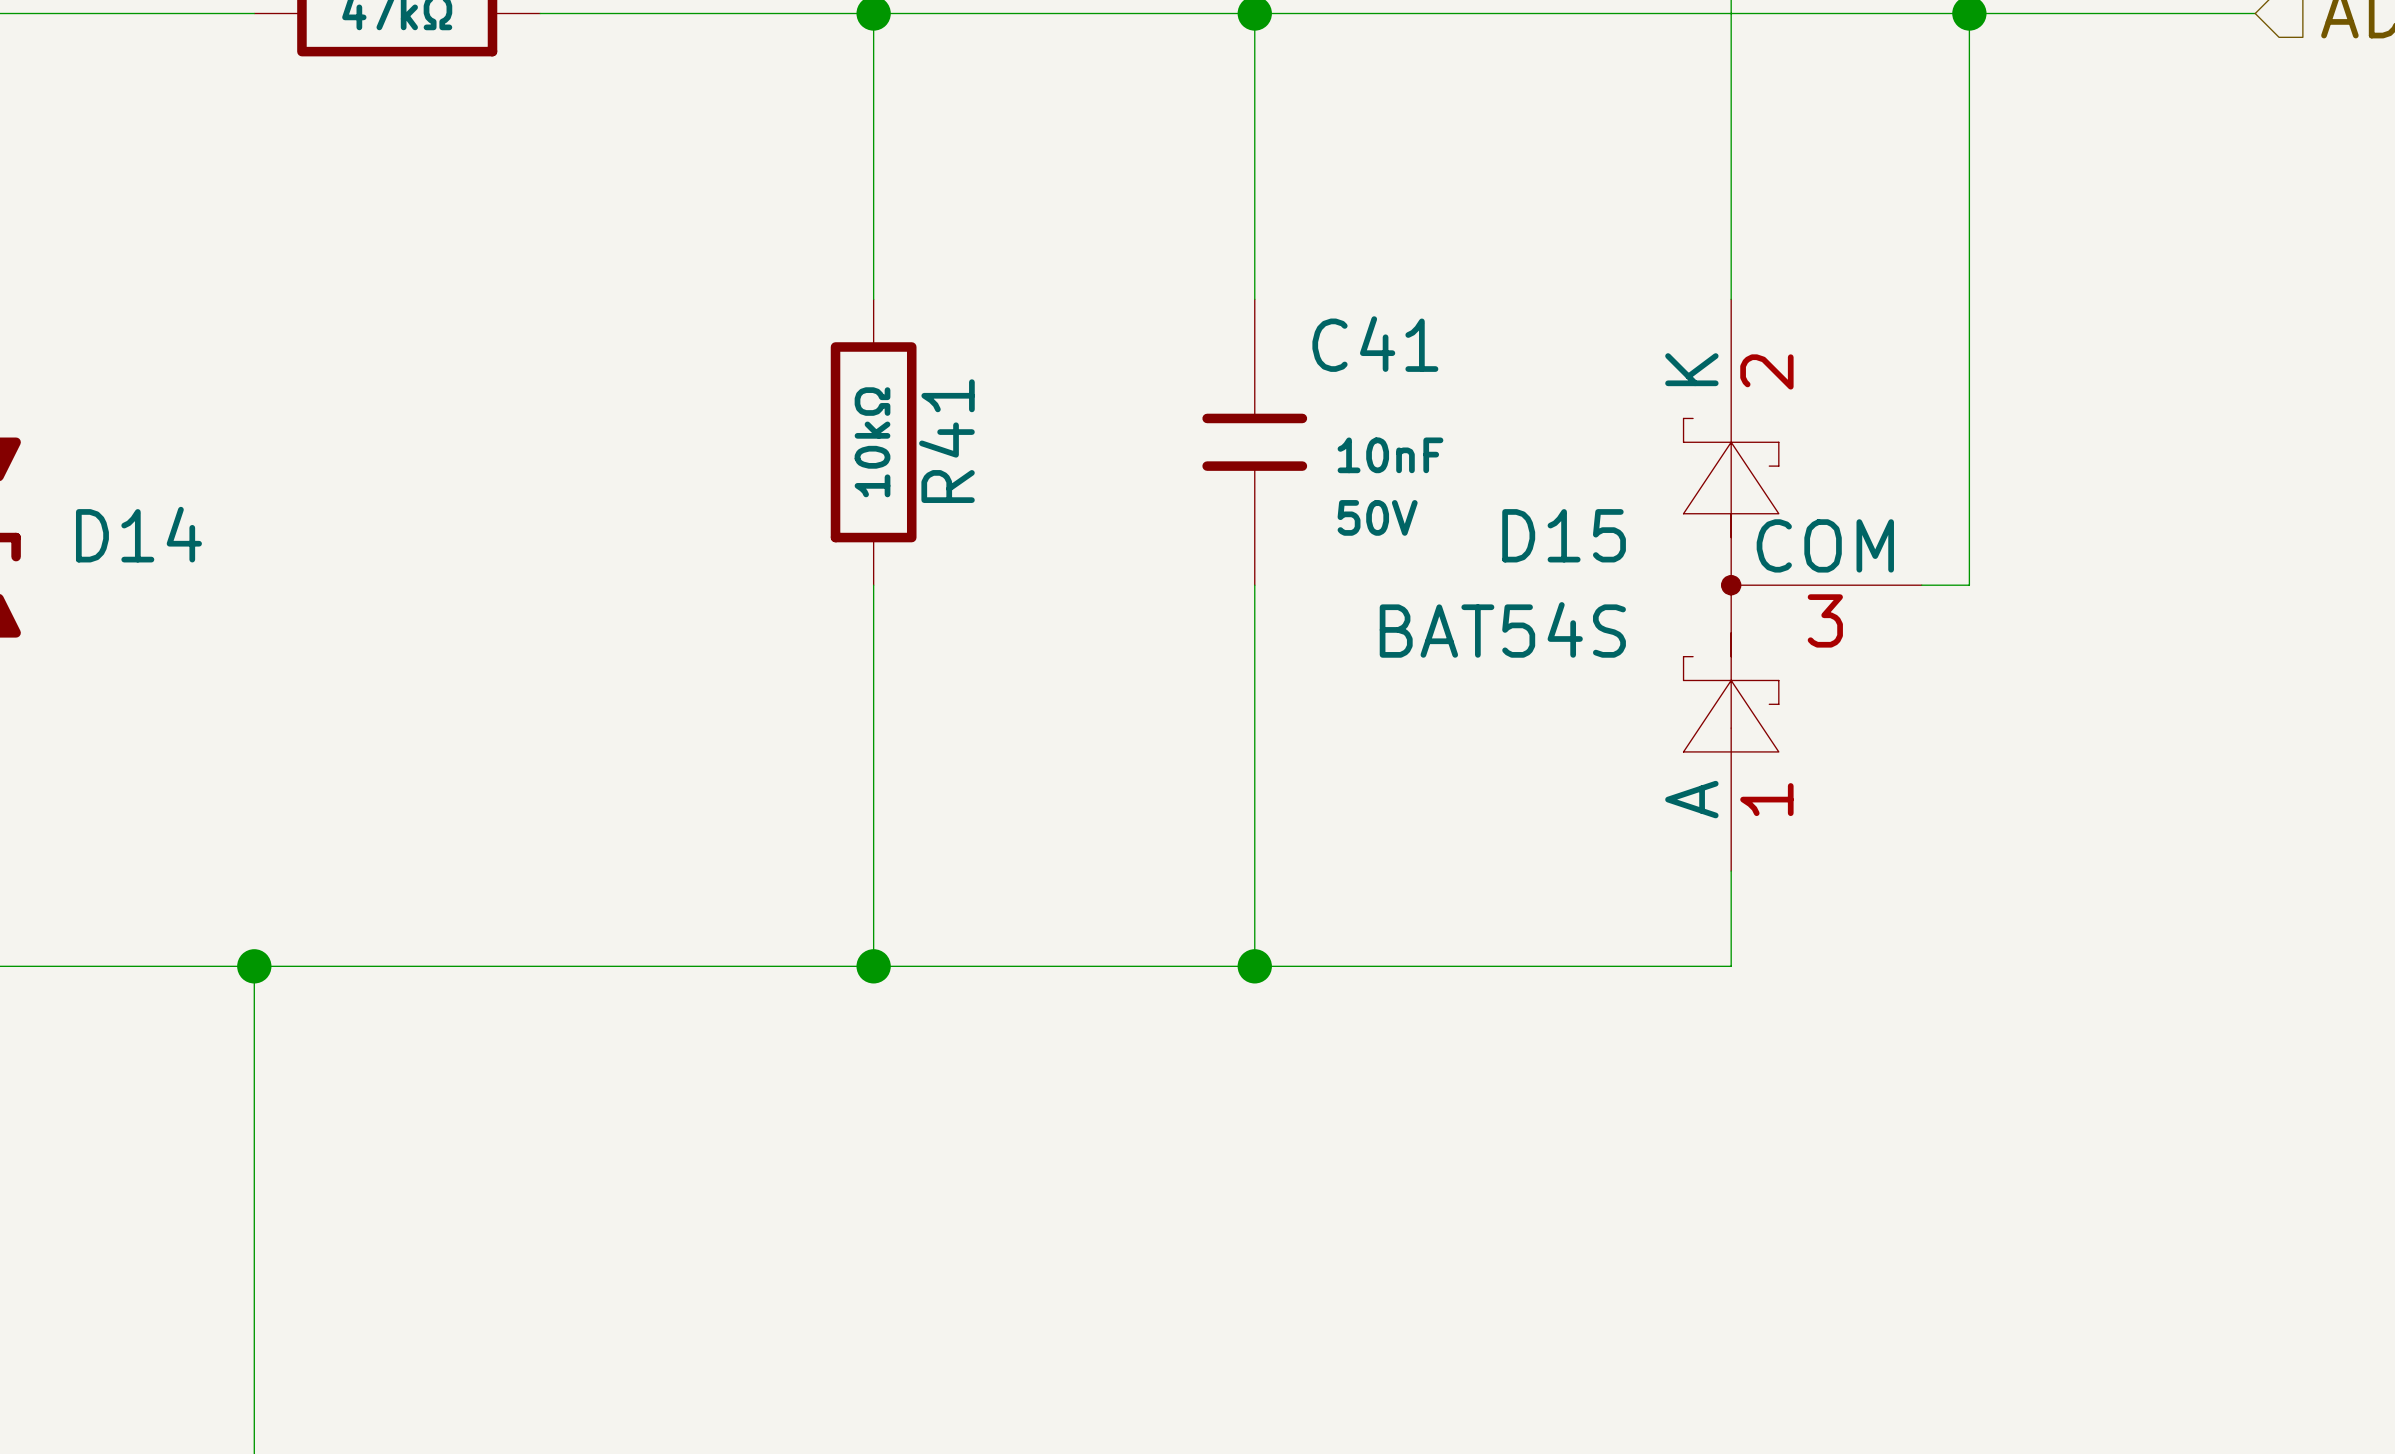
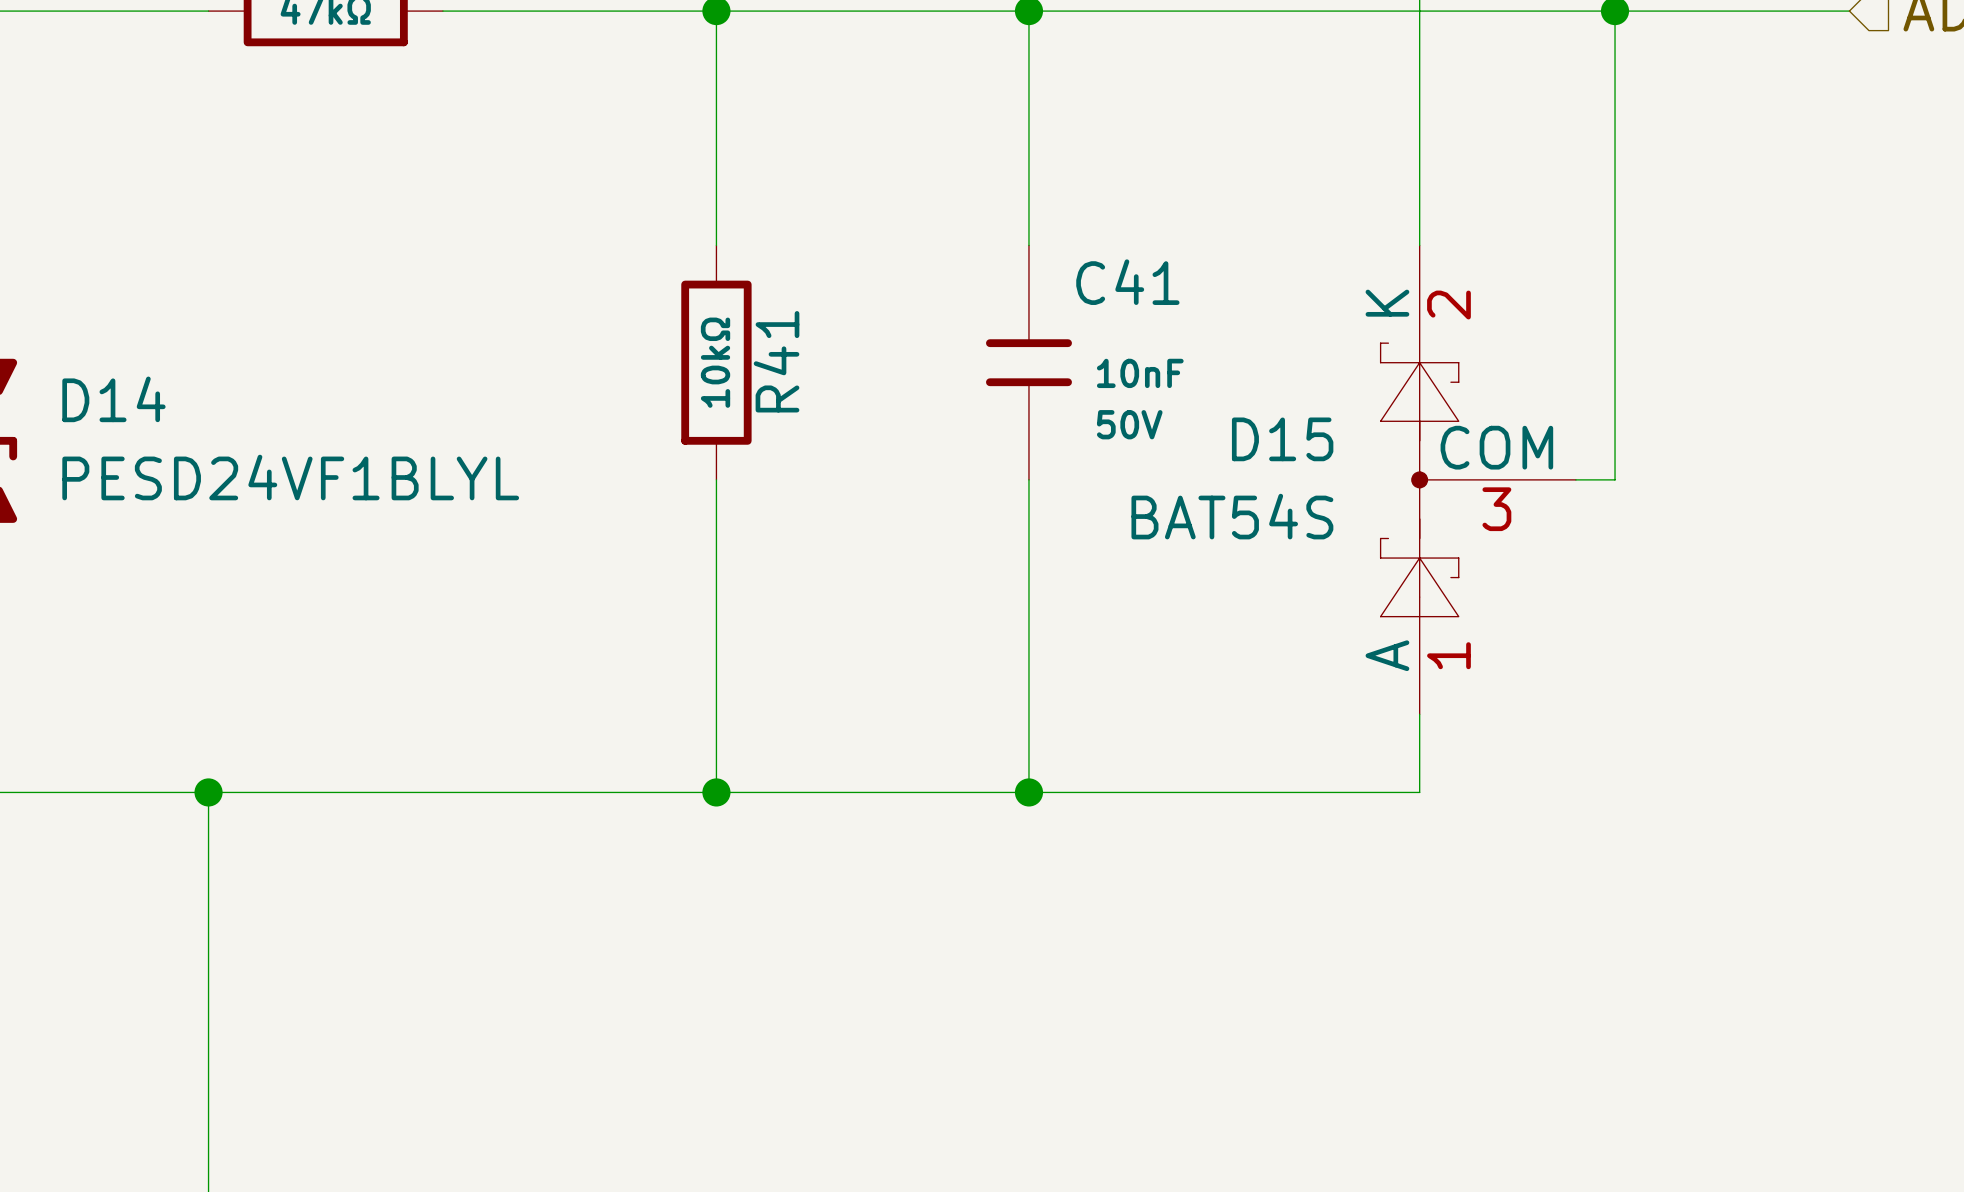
D14 name position: D14 (138, 534) -> D14 (113, 399)
D14 value: none -> PESD24VF1BLYL (290, 477)

